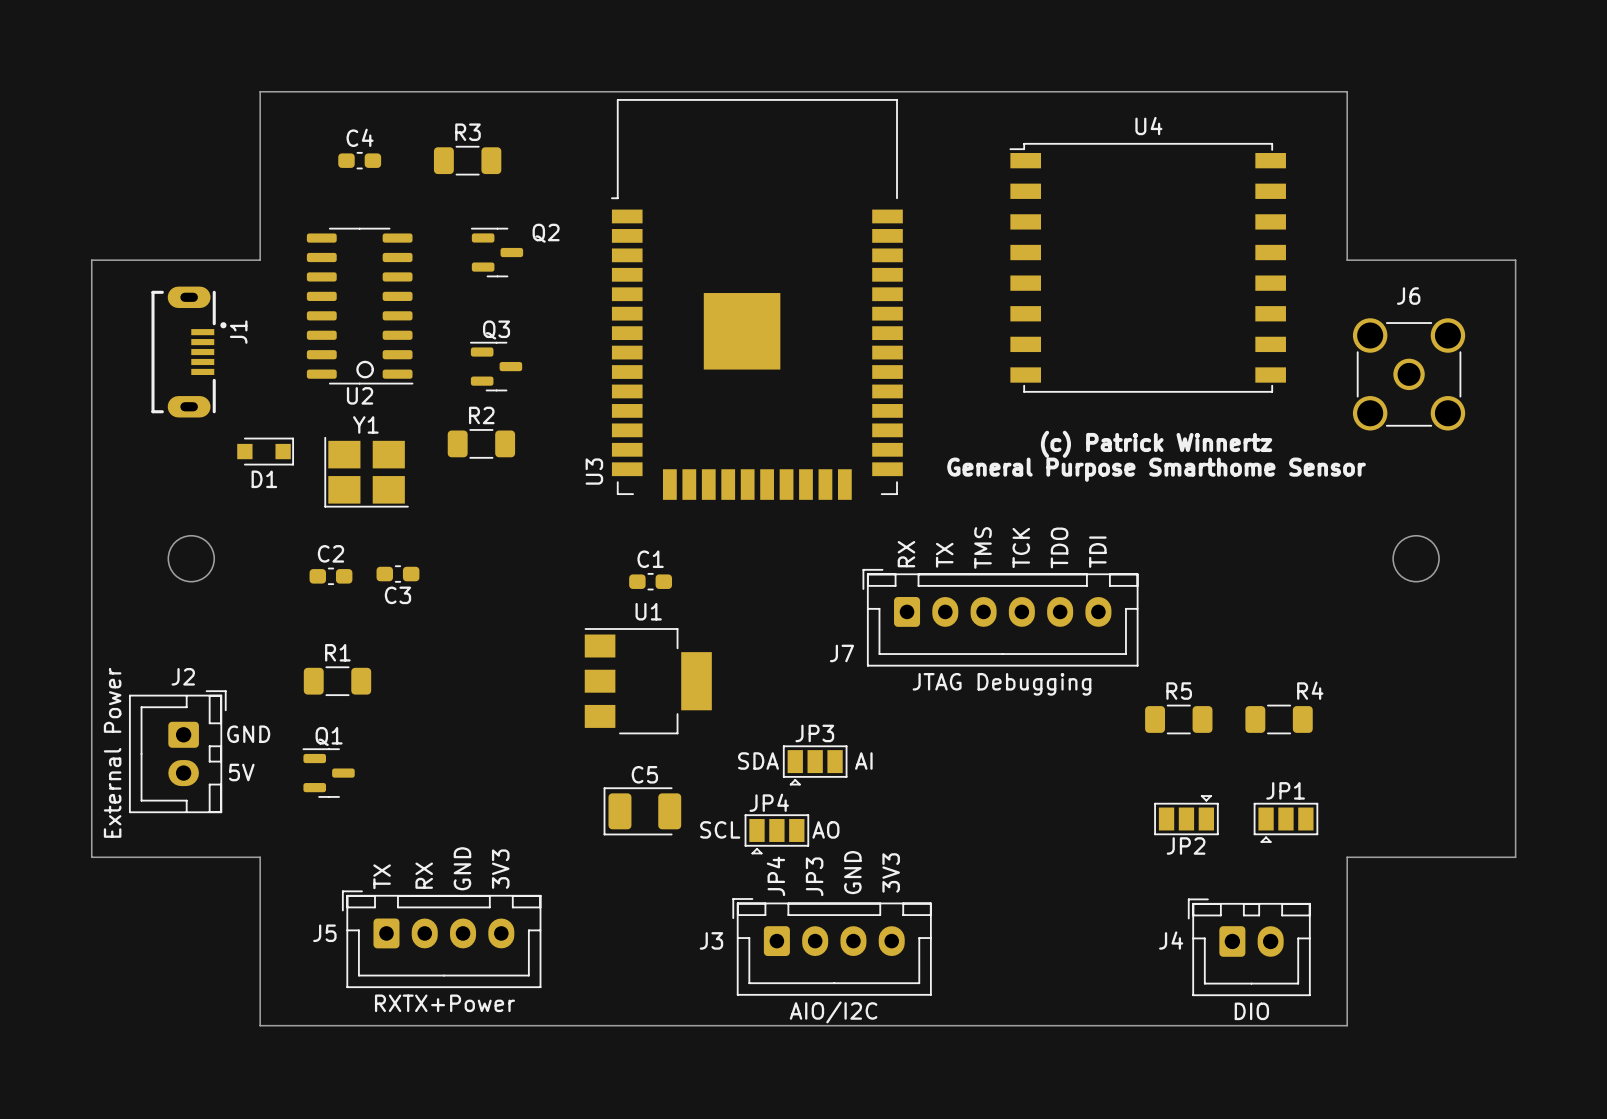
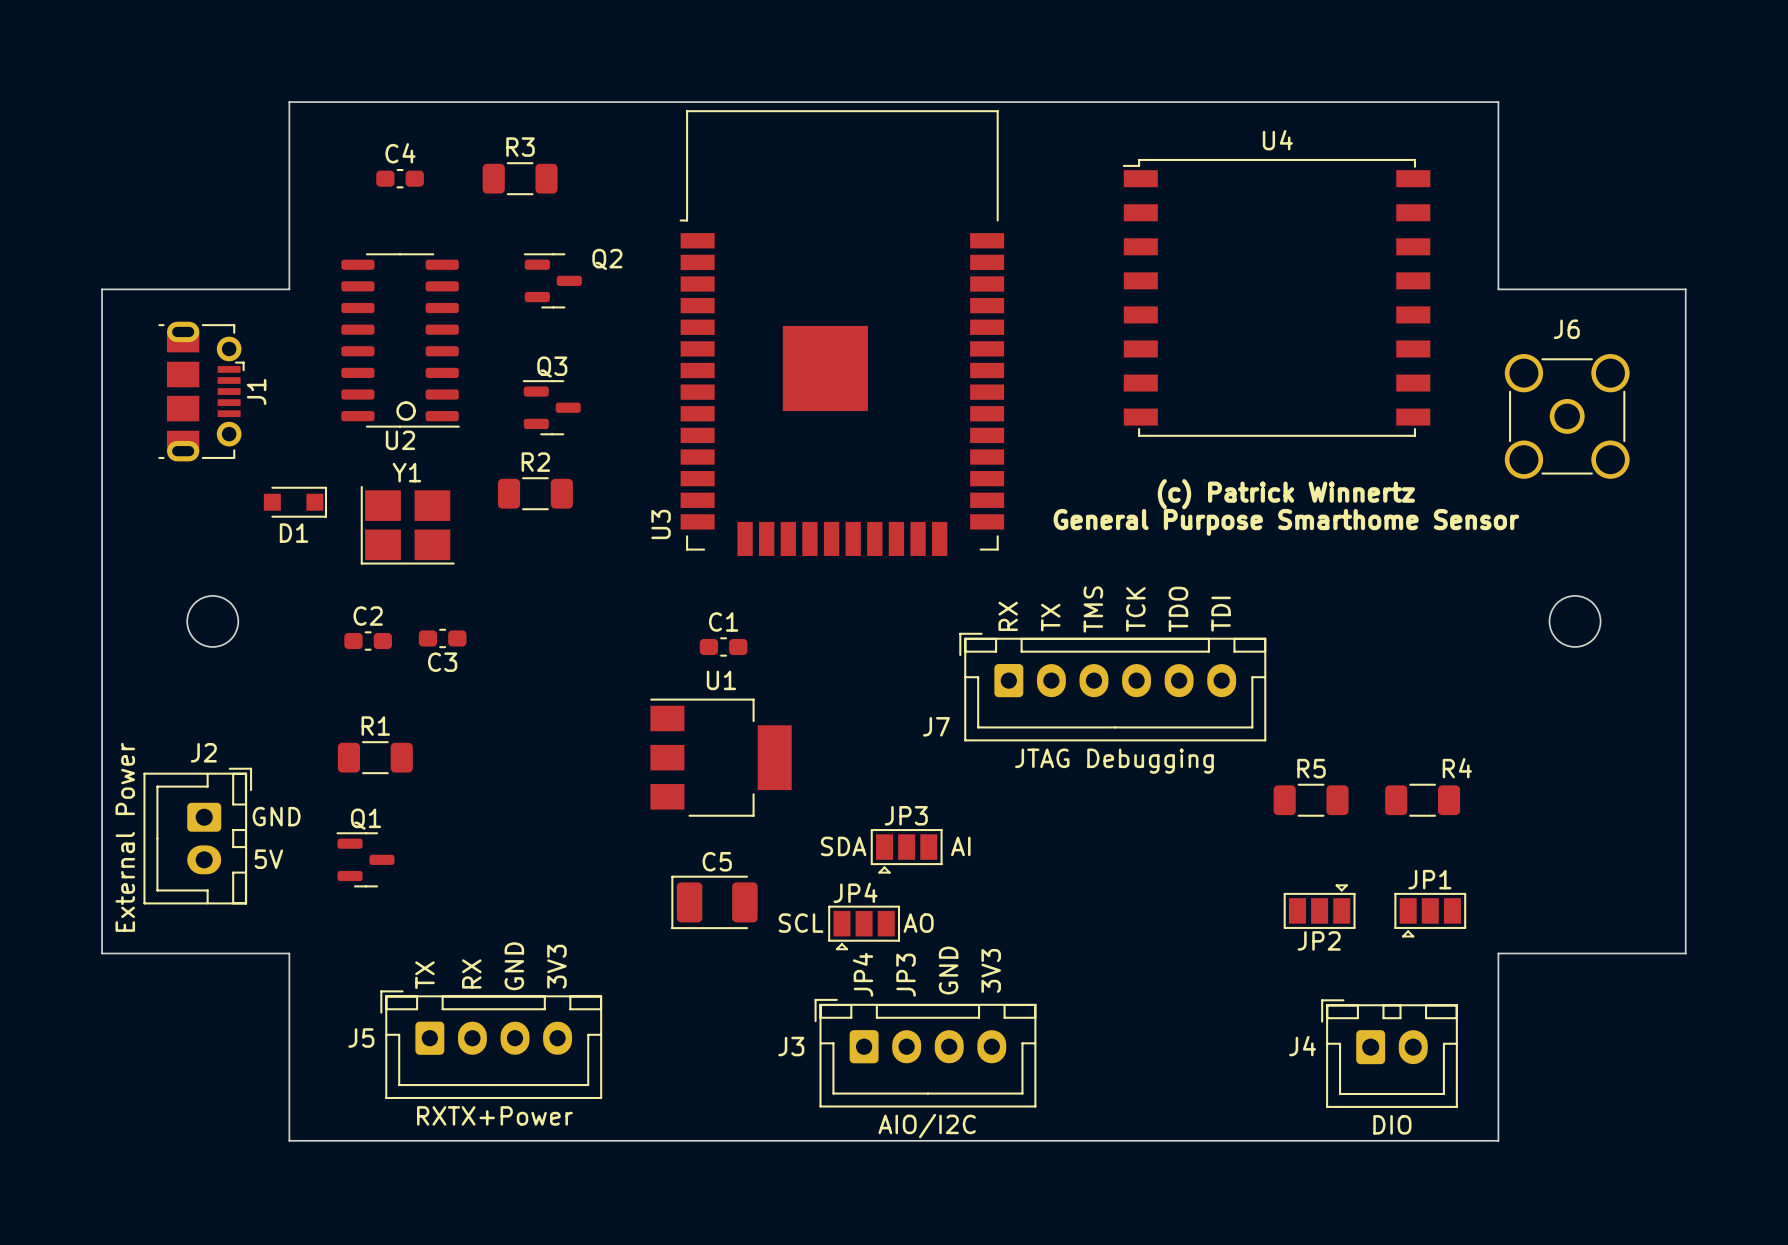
J1 footprint: [151, 286, 227, 418] -> [158, 321, 245, 462]

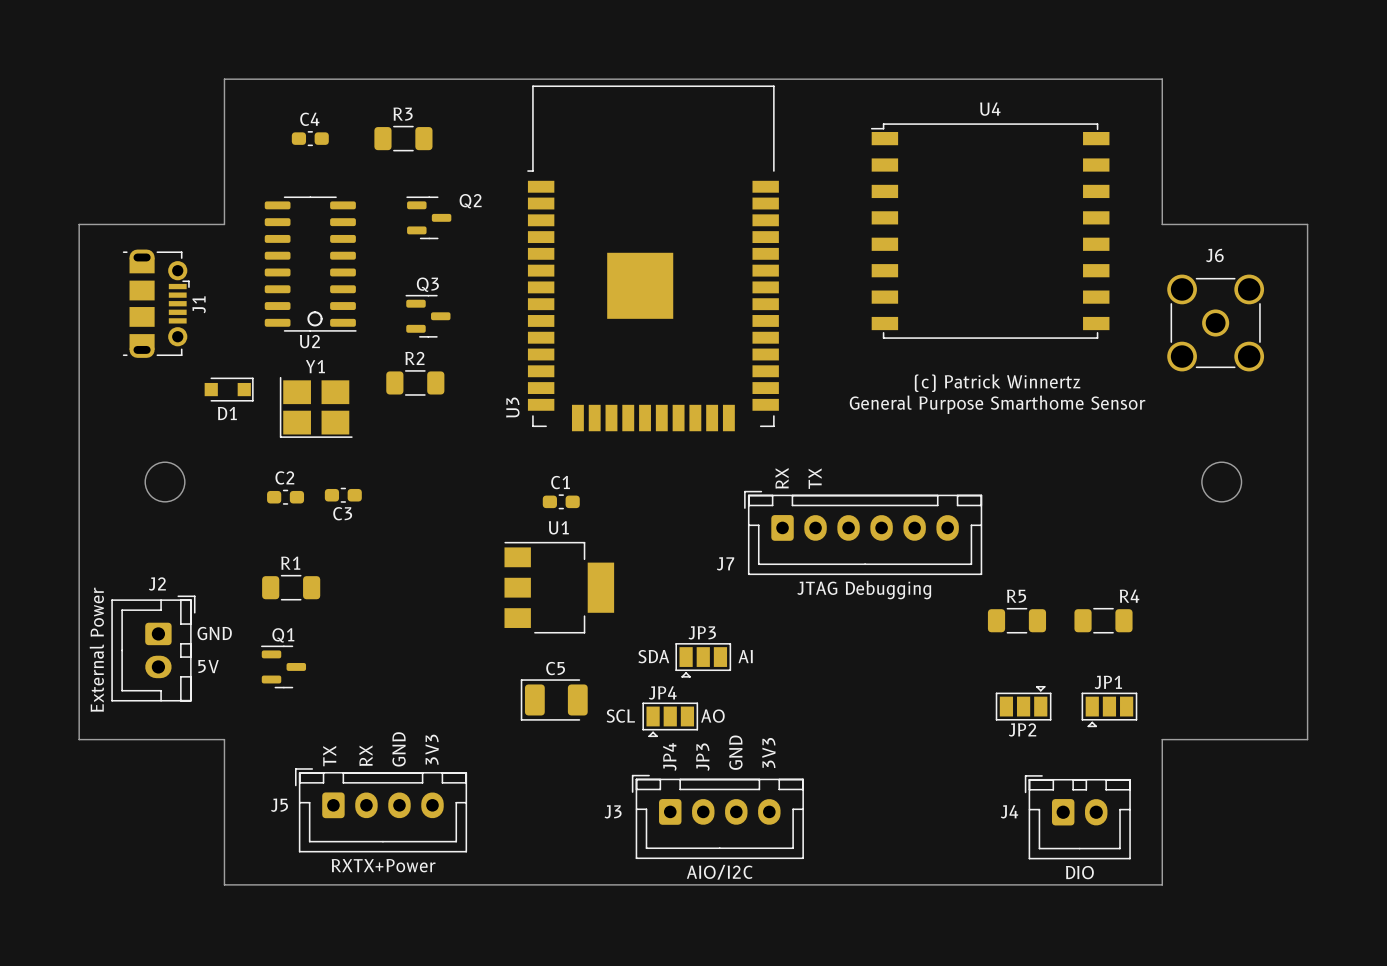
text: TMS (1093, 609) -> none
text: TCK (1135, 609) -> none
text: TDO (1178, 609) -> none
text: TDI (1221, 614) -> none

